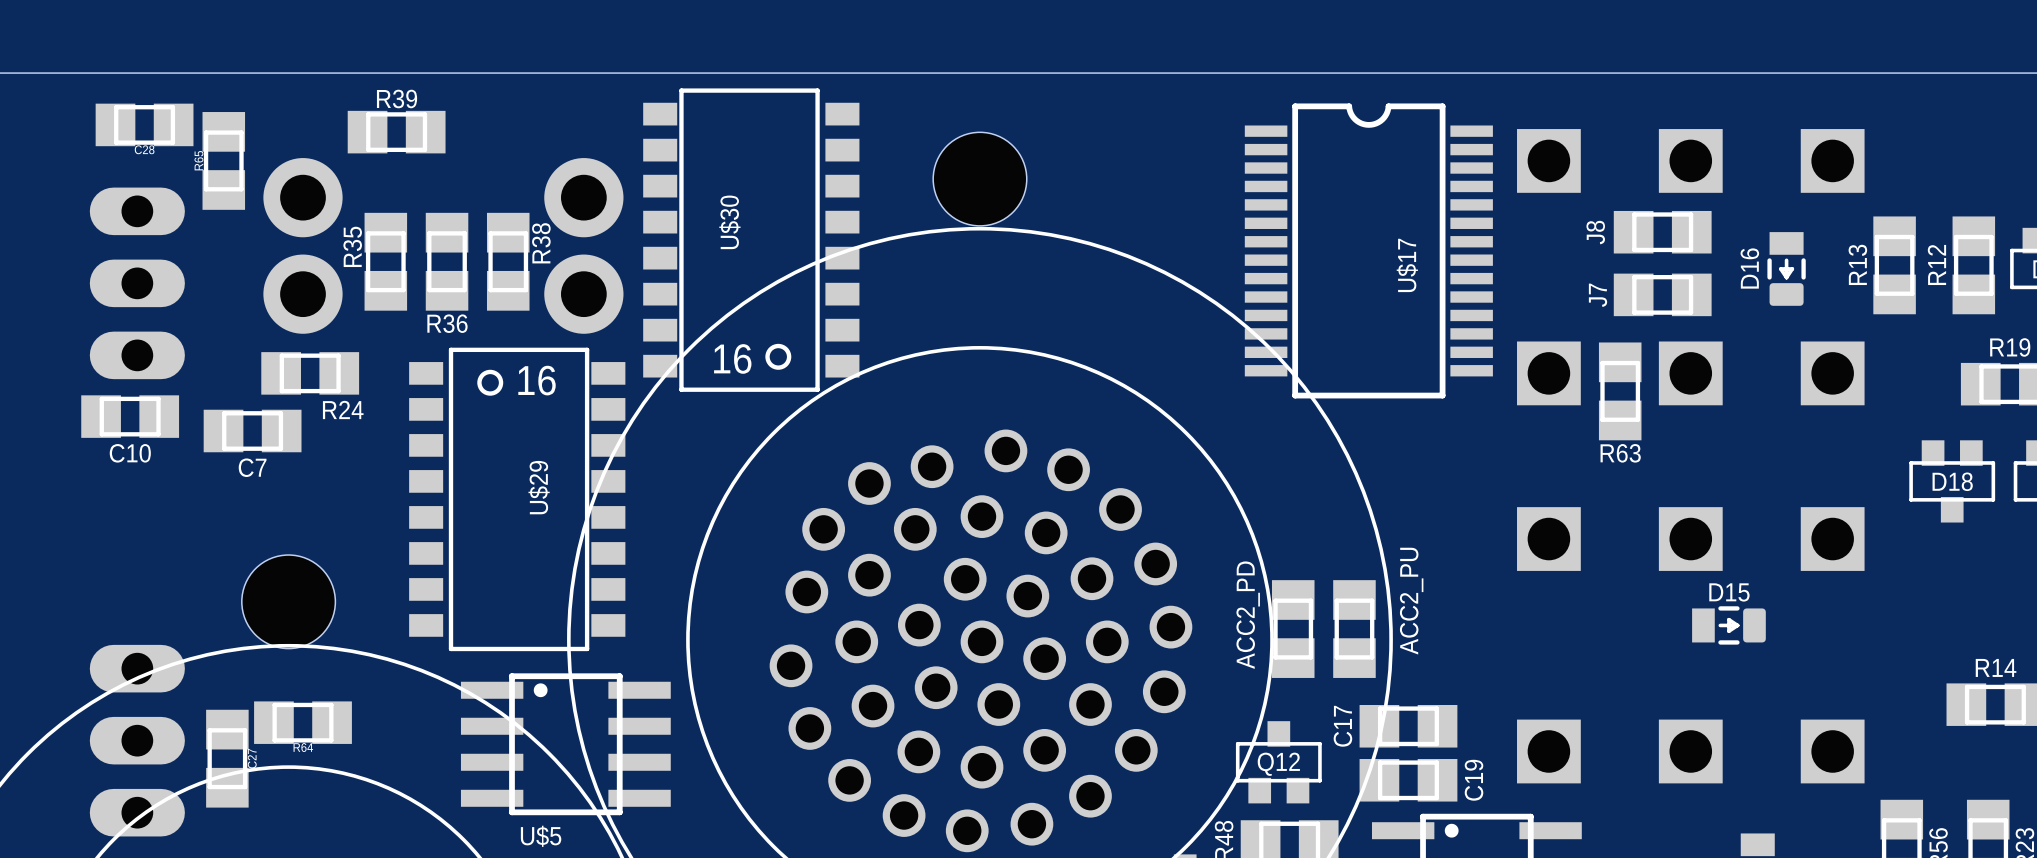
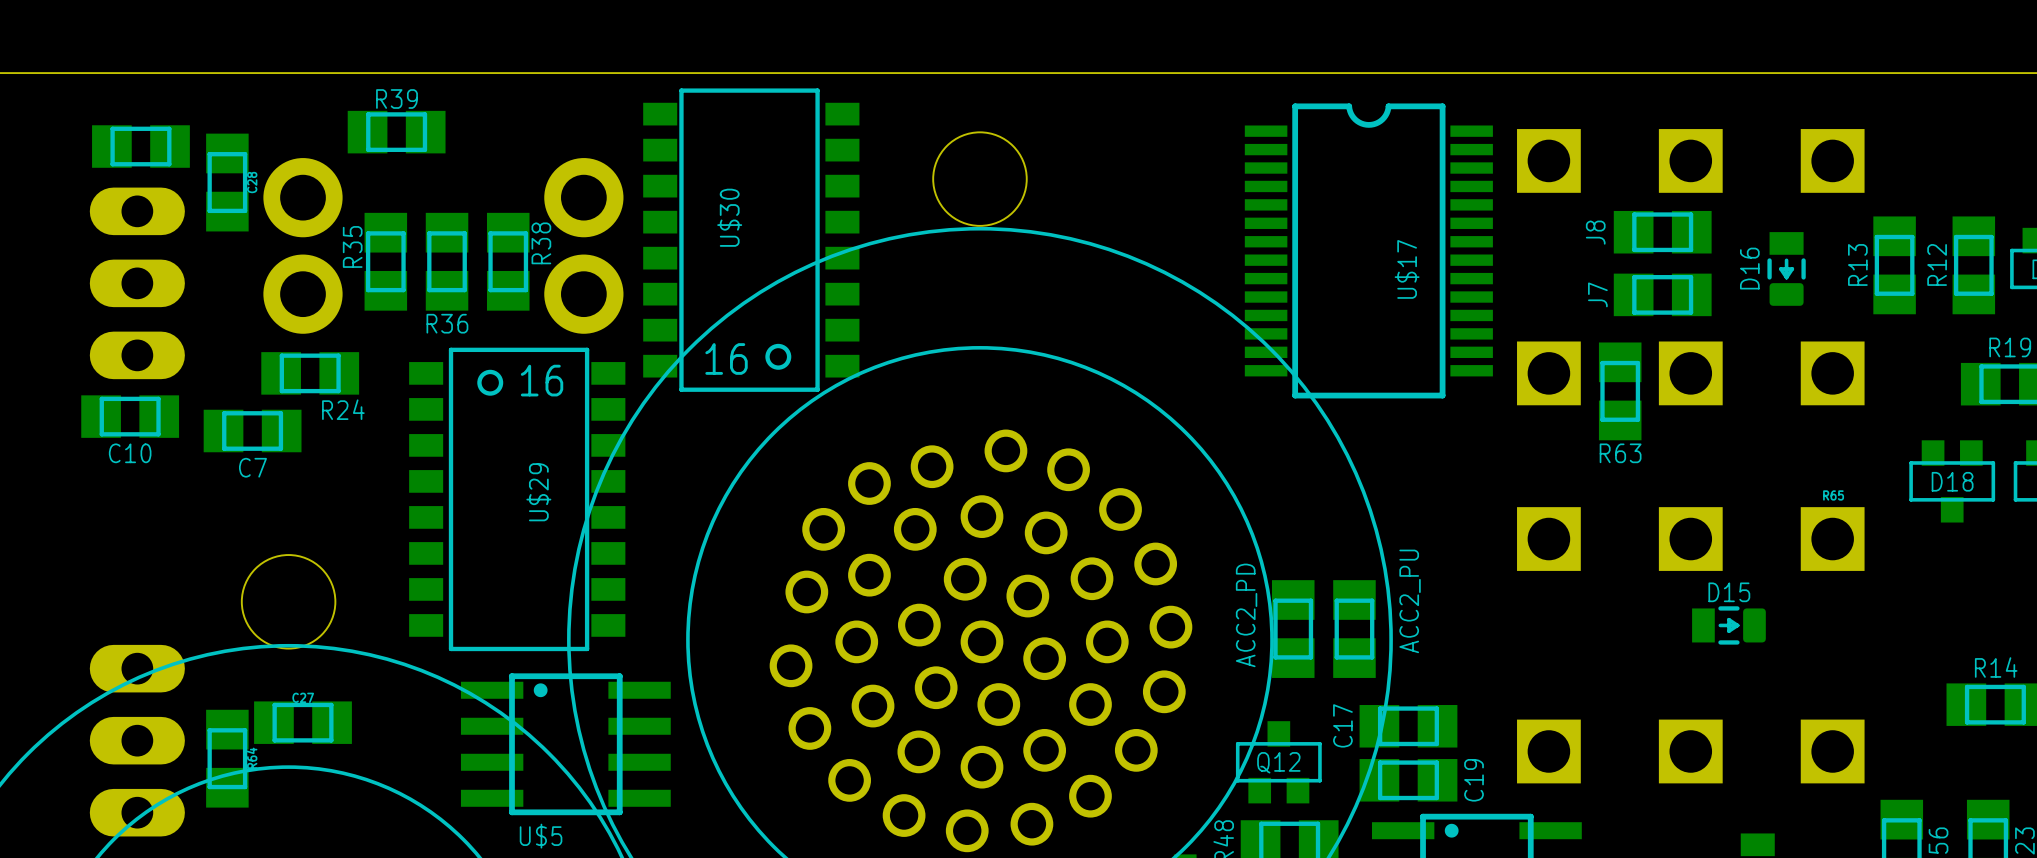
C28 rotation: 0° (144, 124) -> 90° clockwise (227, 182)
C28 position: (144, 124) -> (227, 182)
R65 name position: R65 (198, 160) -> R65 (1833, 495)
R65 rotation: 0° (223, 160) -> 90° clockwise (140, 146)
R65 position: (223, 160) -> (140, 146)
R64 name: R64 (303, 747) -> C27 (303, 697)
C27 name: C27 (252, 758) -> R64 (252, 758)

